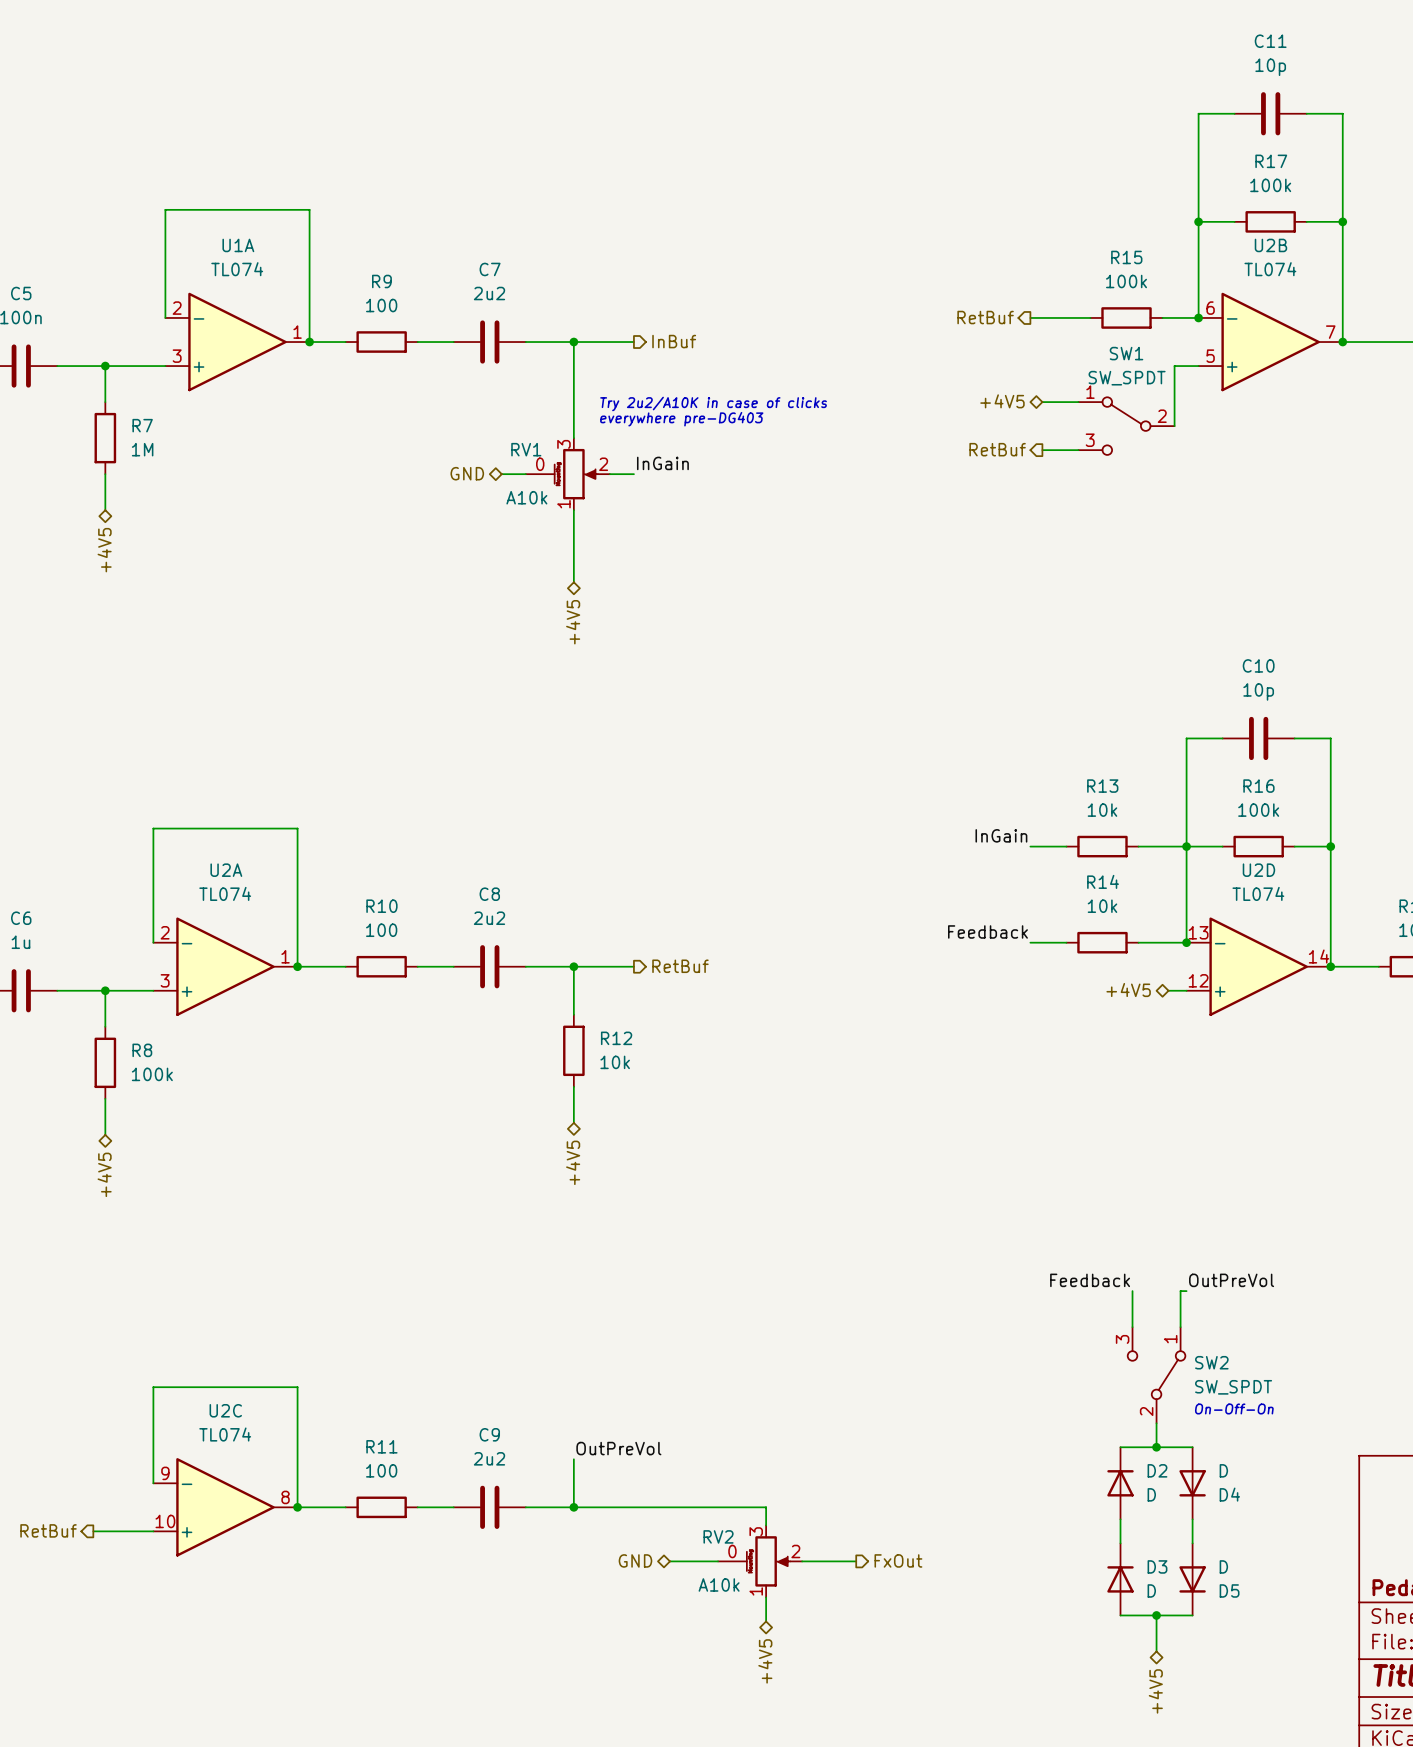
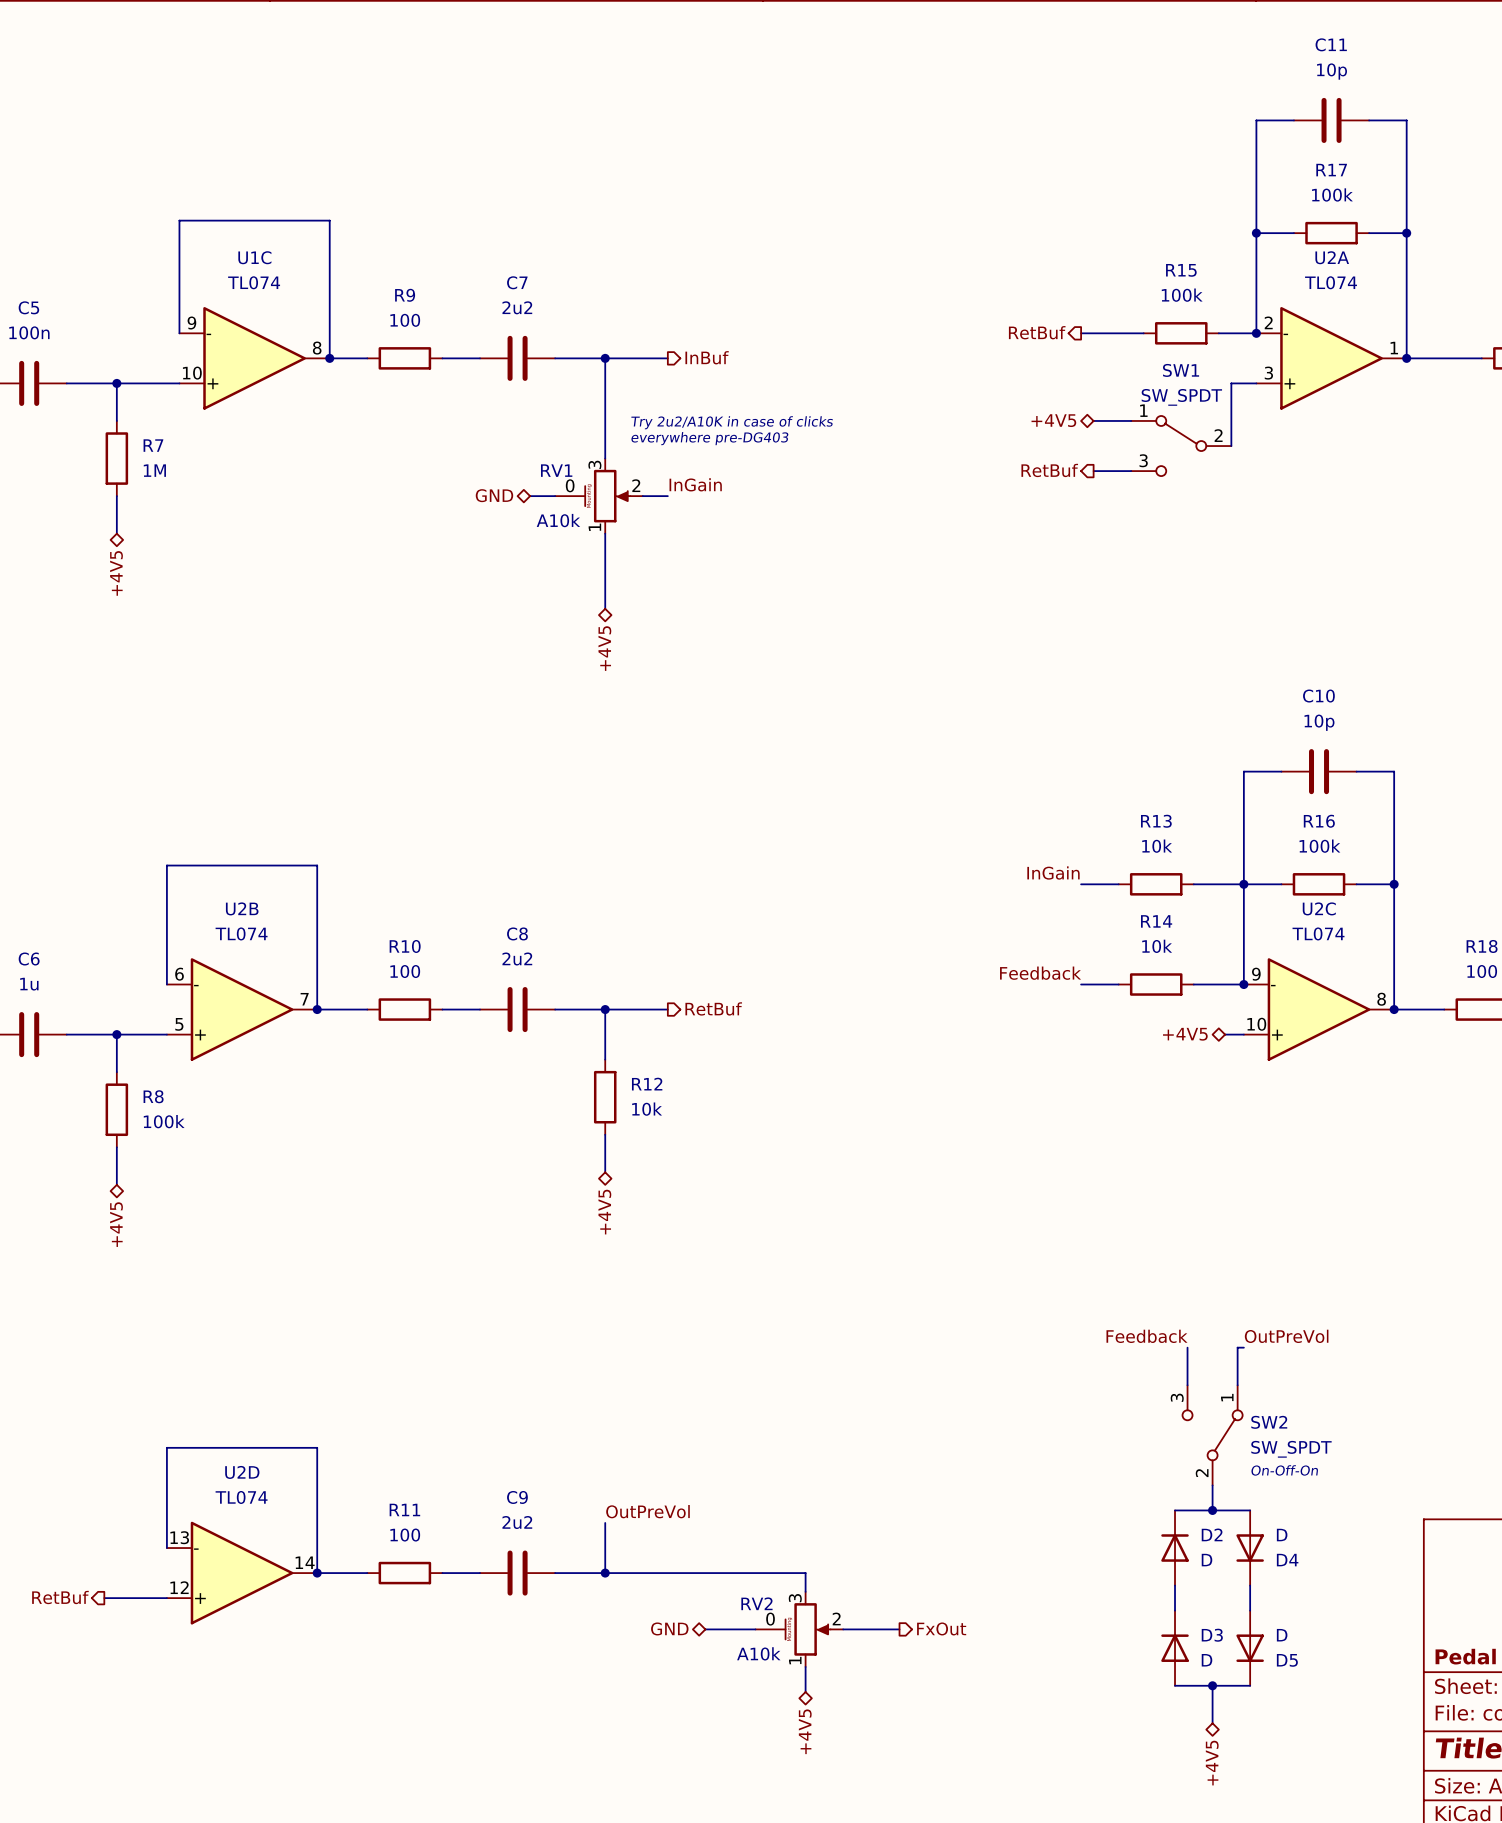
U1A name: U1A (238, 245) -> U1C (254, 257)
U1A pin number: 2 (177, 308) -> 9 (191, 323)
U1A pin number: 1 (297, 332) -> 8 (317, 348)
U2B position: (1270, 342) -> (242, 1009)
U1A pin number: 3 (177, 356) -> 10 (192, 373)
U2A position: (225, 966) -> (1331, 358)
U2D position: (1258, 966) -> (242, 1573)
U2C position: (225, 1507) -> (1319, 1009)

